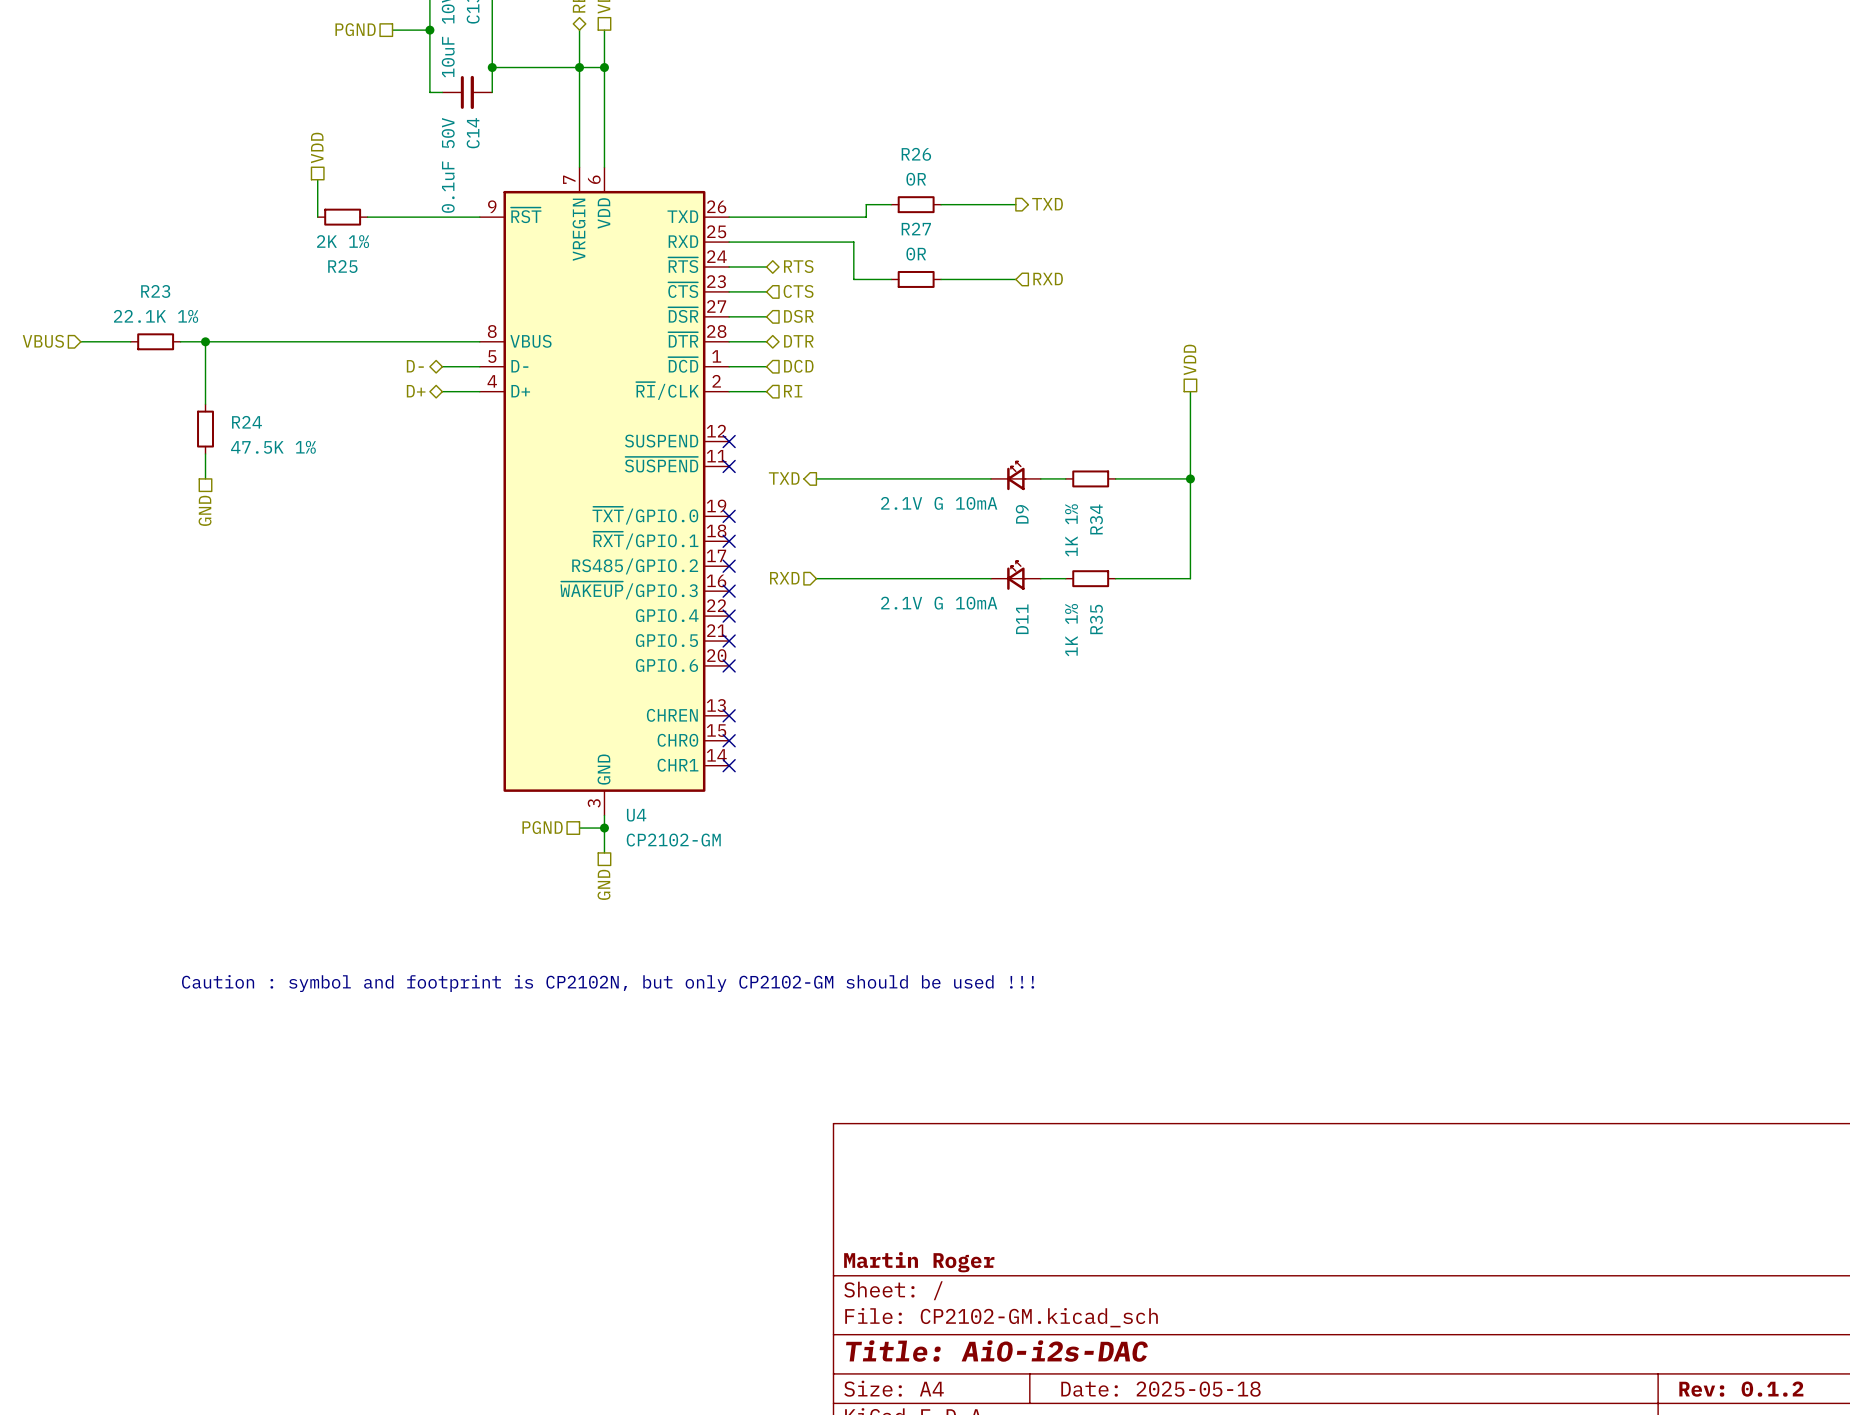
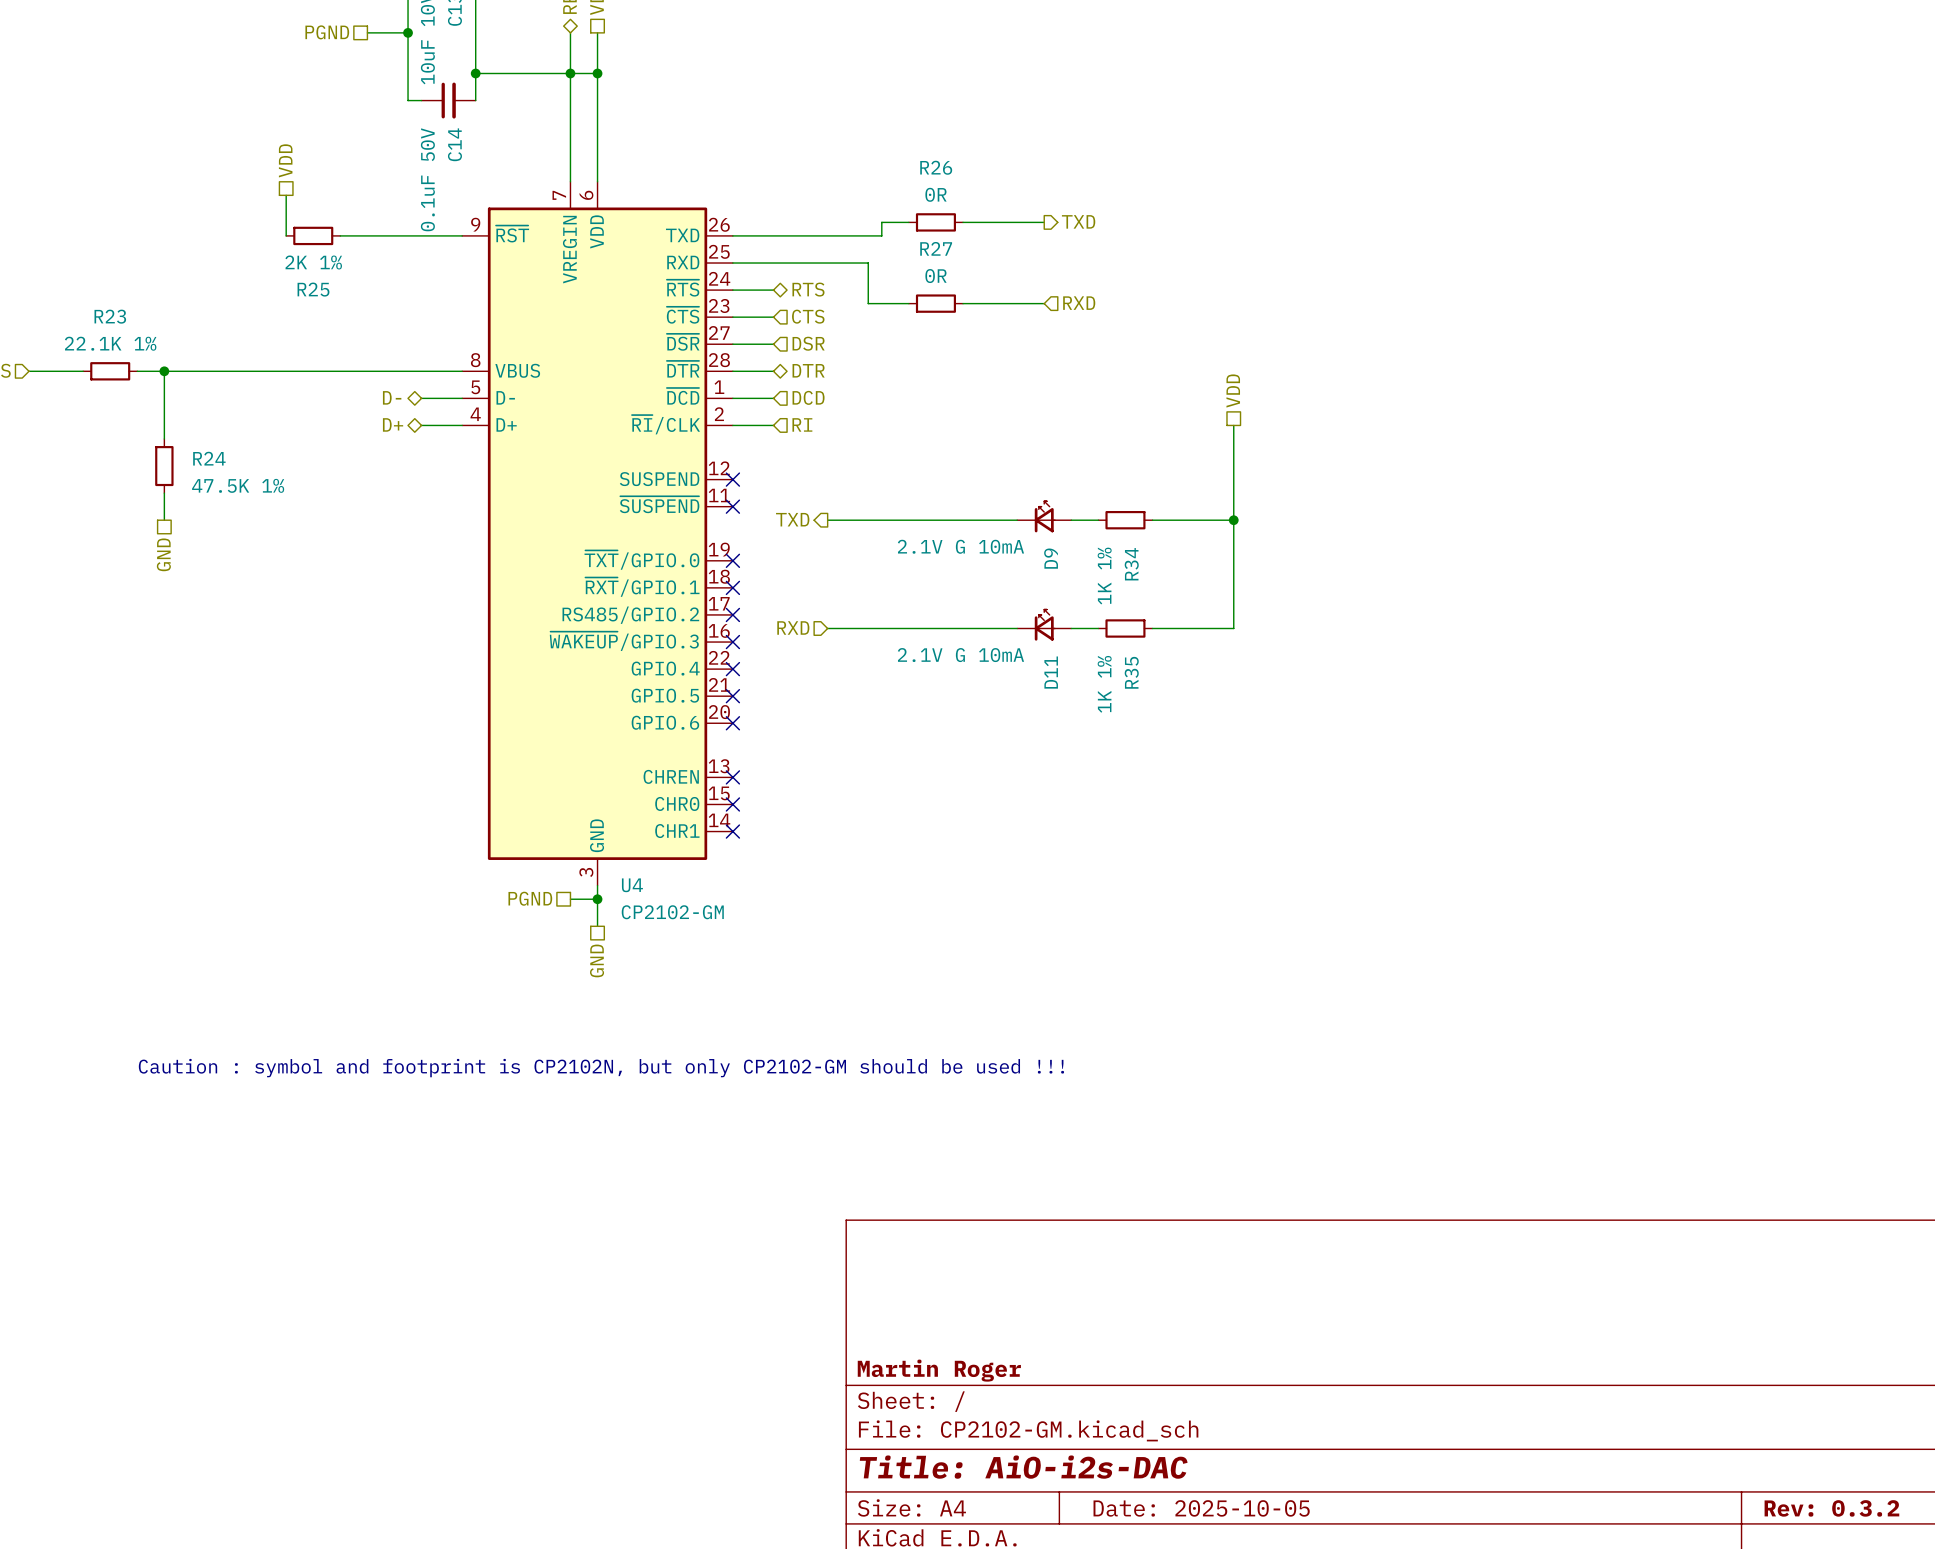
title block: Date: 2025-05-18 (1160, 1389) -> Date: 2025-10-05 (1201, 1508)
title block: Rev: 0.1.2 (1741, 1389) -> Rev: 0.3.2 (1831, 1508)

